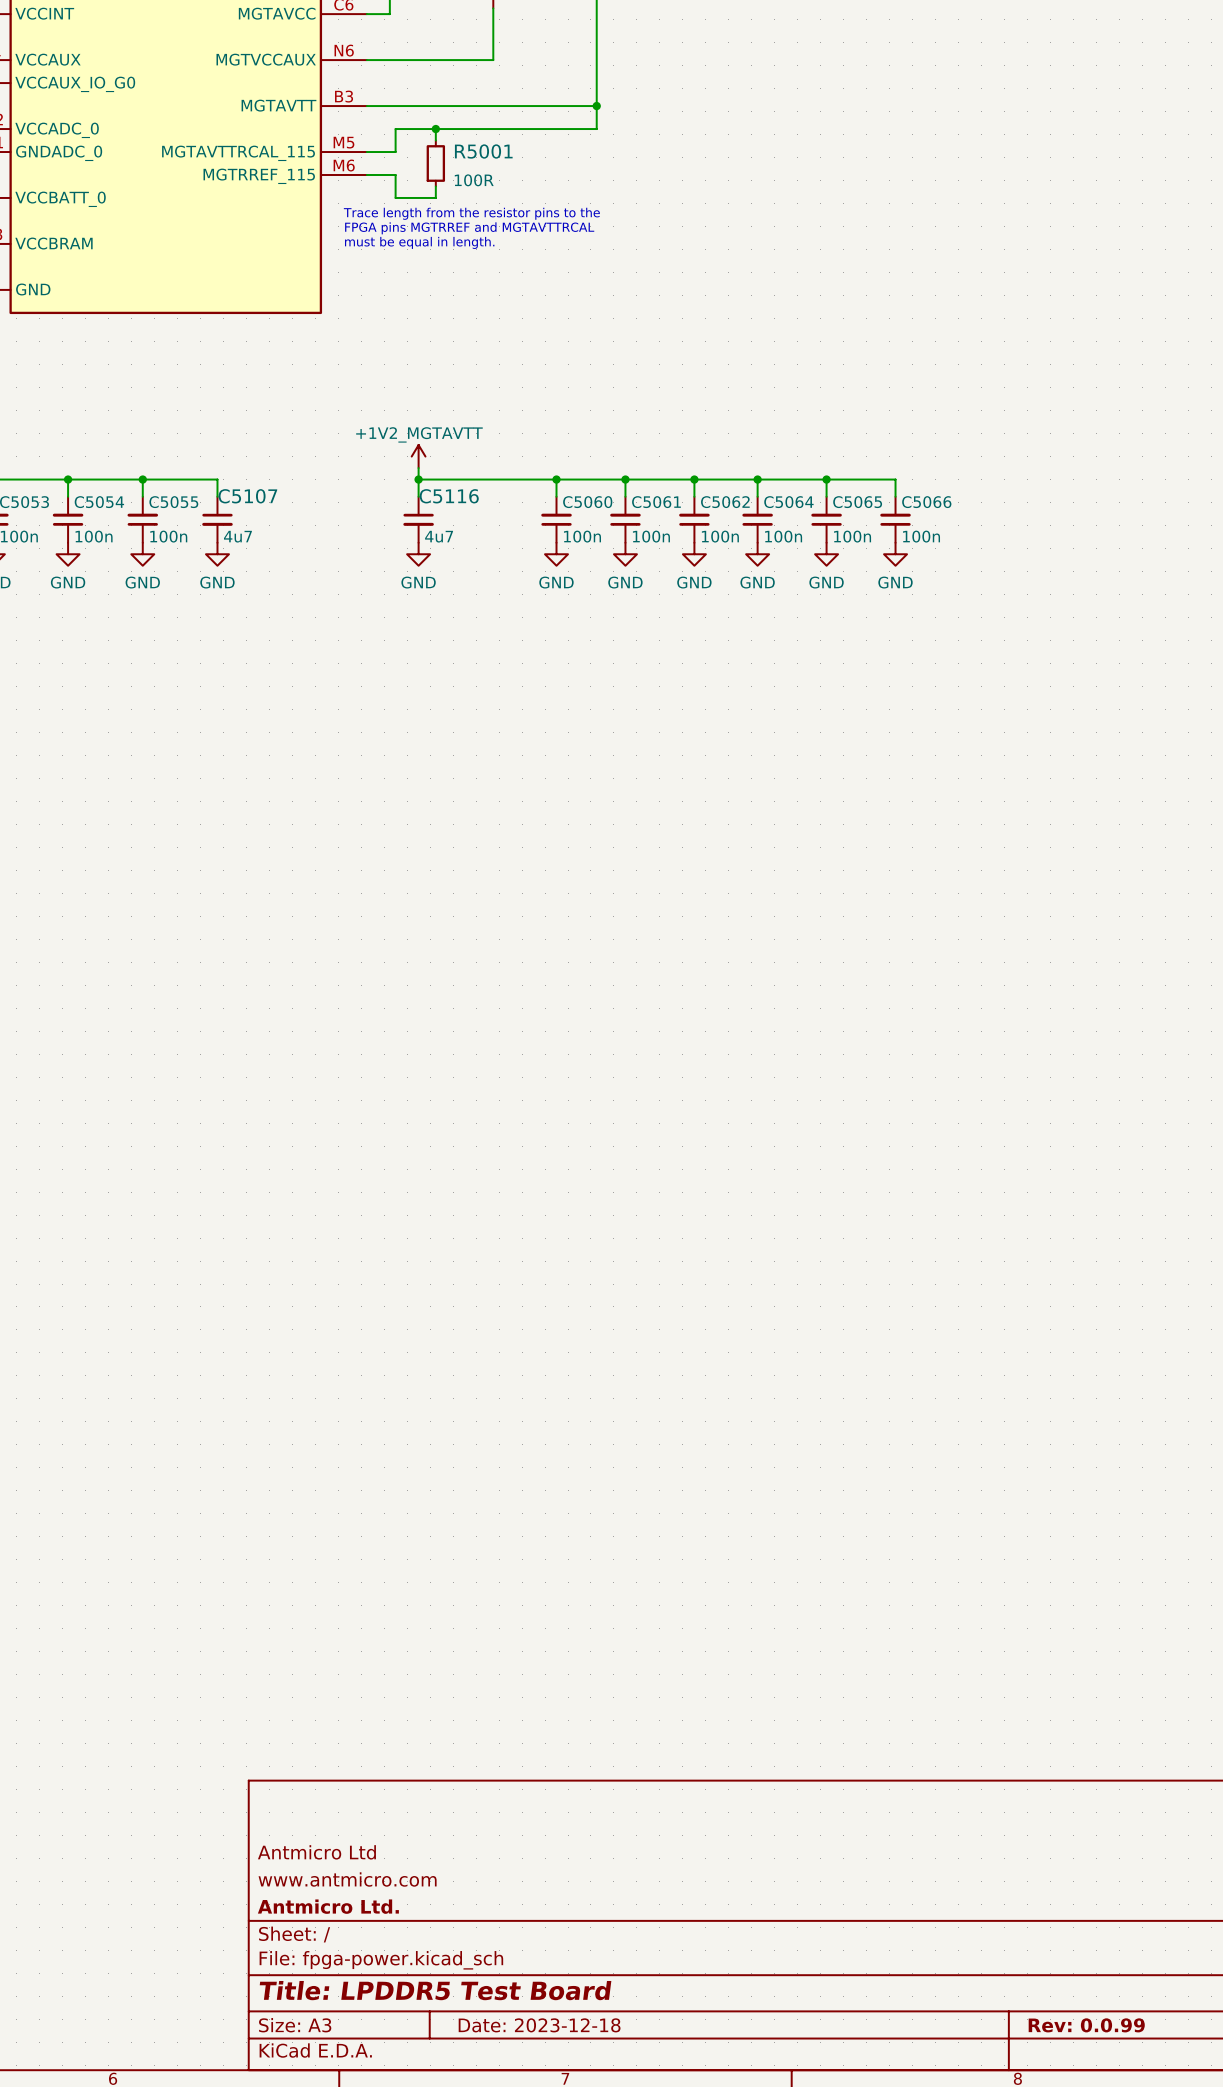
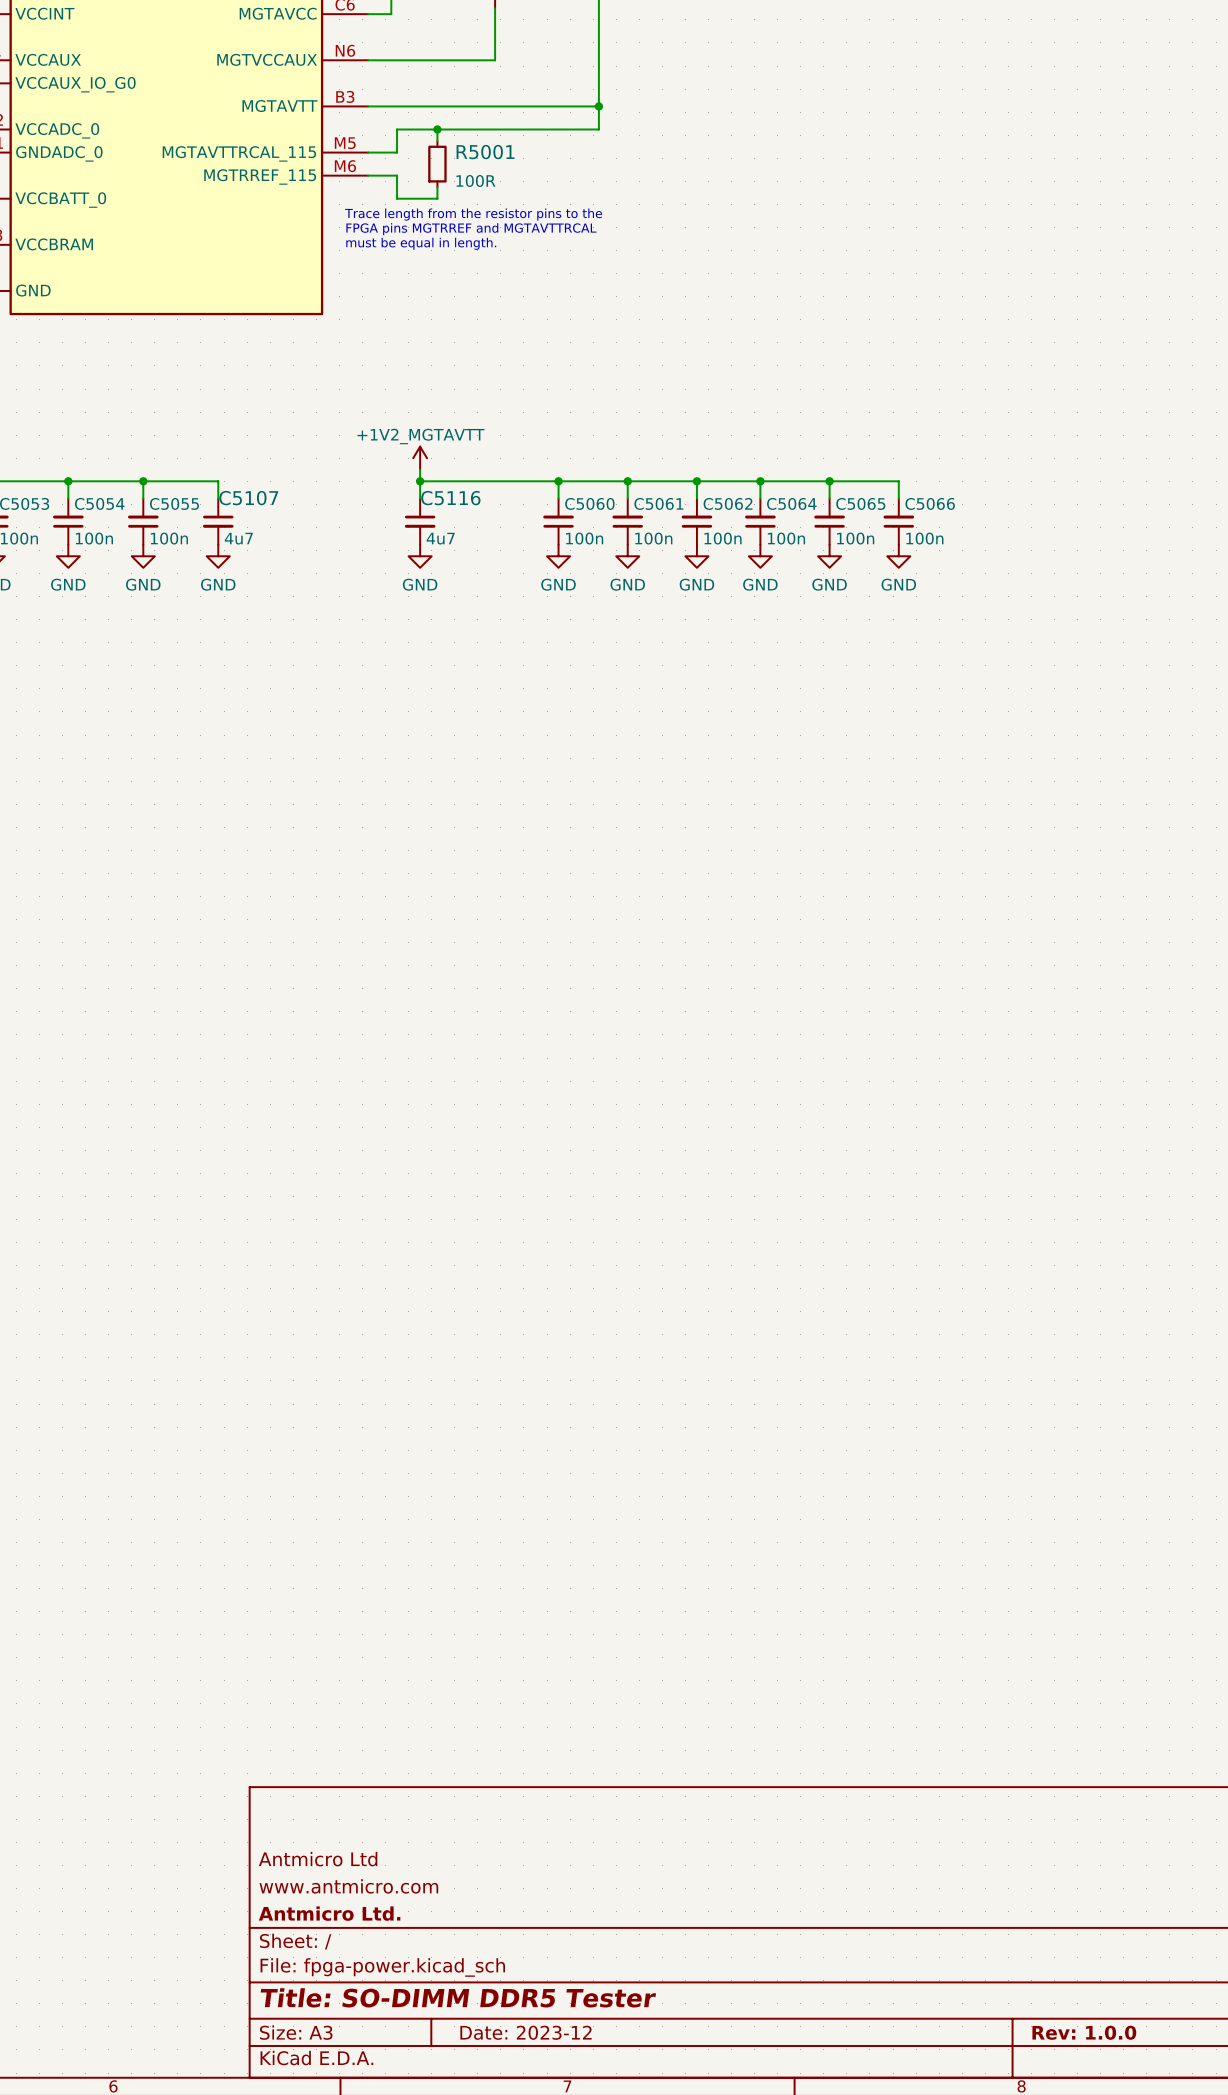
title block: Title: LPDDR5 Test Board (435, 1990) -> Title: SO-DIMM DDR5 Tester (458, 1997)
title block: Date: 2023-12-18 (539, 2025) -> Date: 2023-12 (526, 2032)
title block: Rev: 0.0.99 (1086, 2025) -> Rev: 1.0.0 (1084, 2032)

